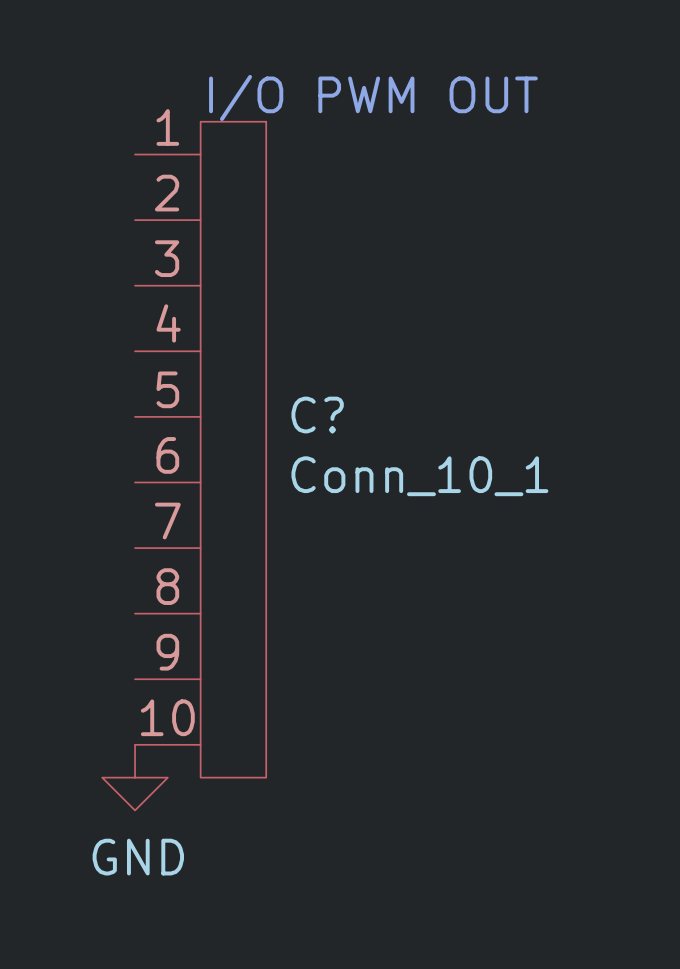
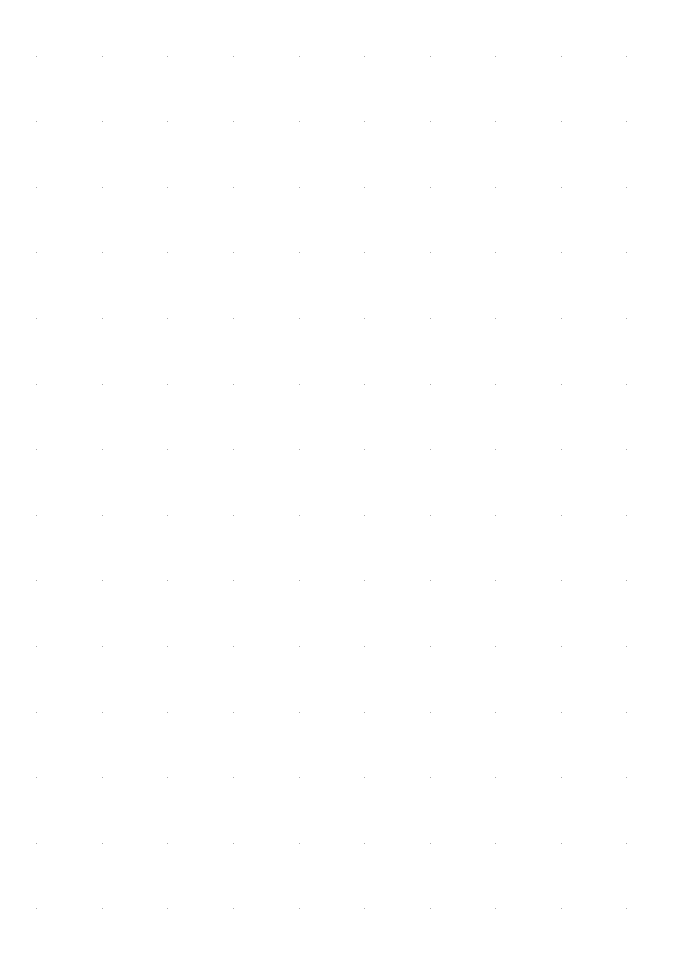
text: I/O PWM OUT (373, 97) -> none
C?: Conn_10_1 (200, 449) -> none
power symbol: GND (135, 777) -> none

